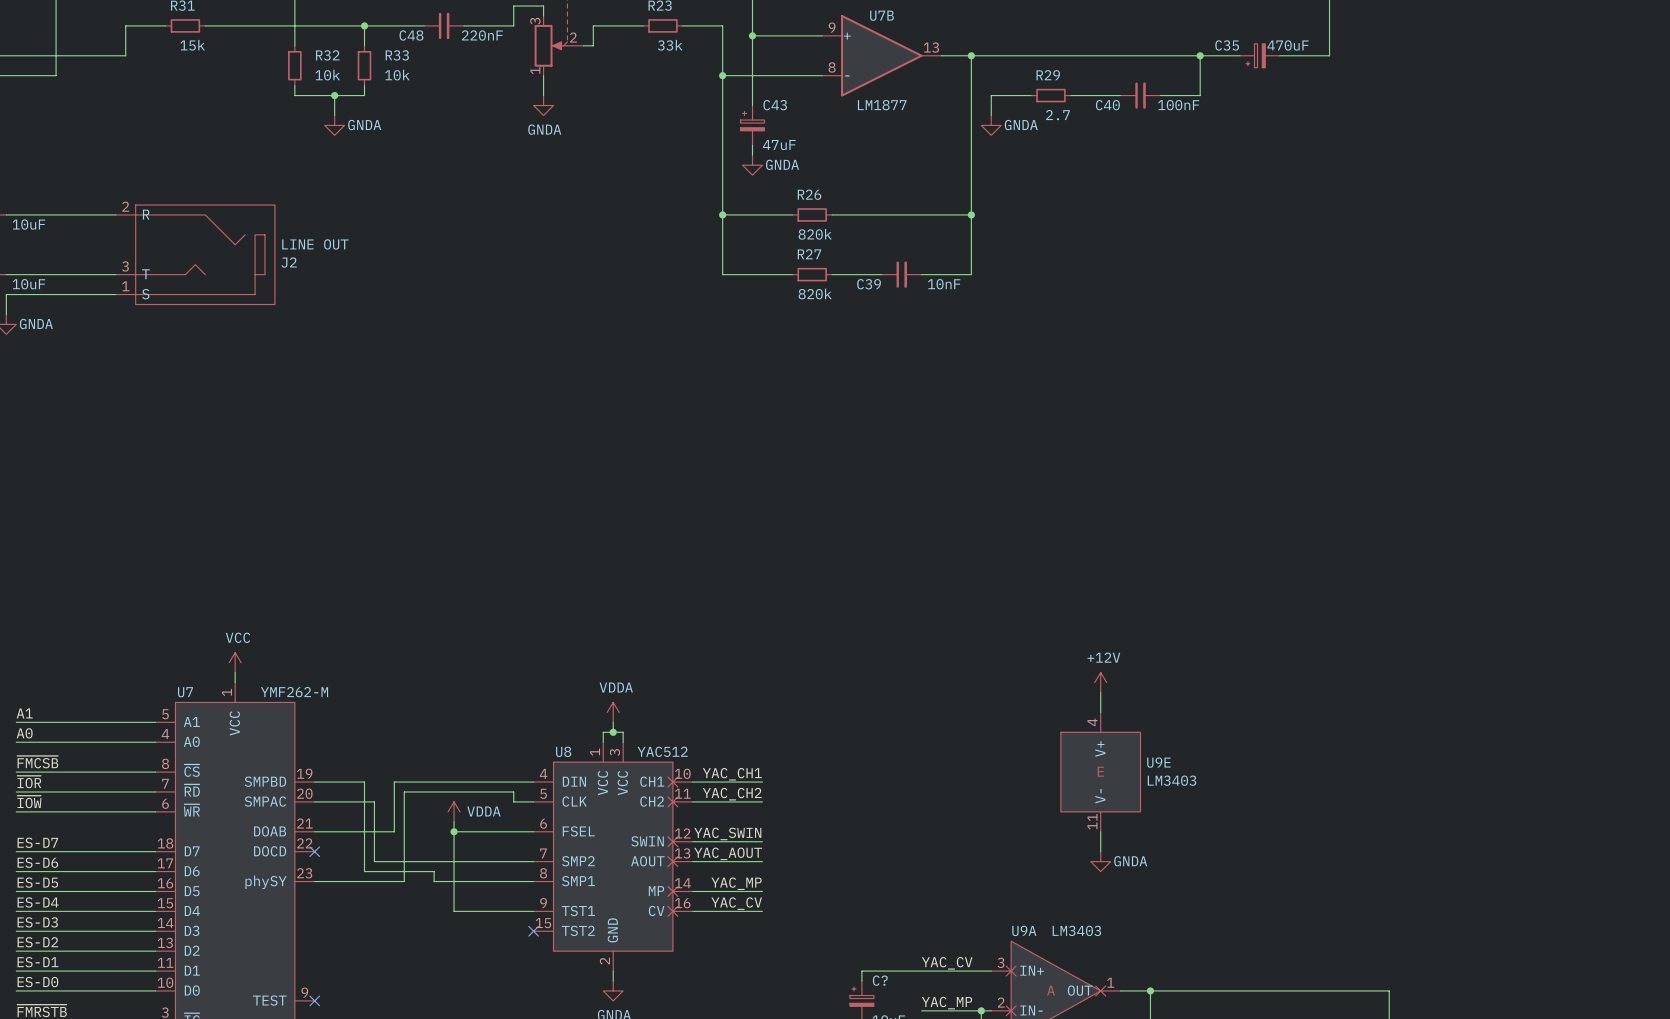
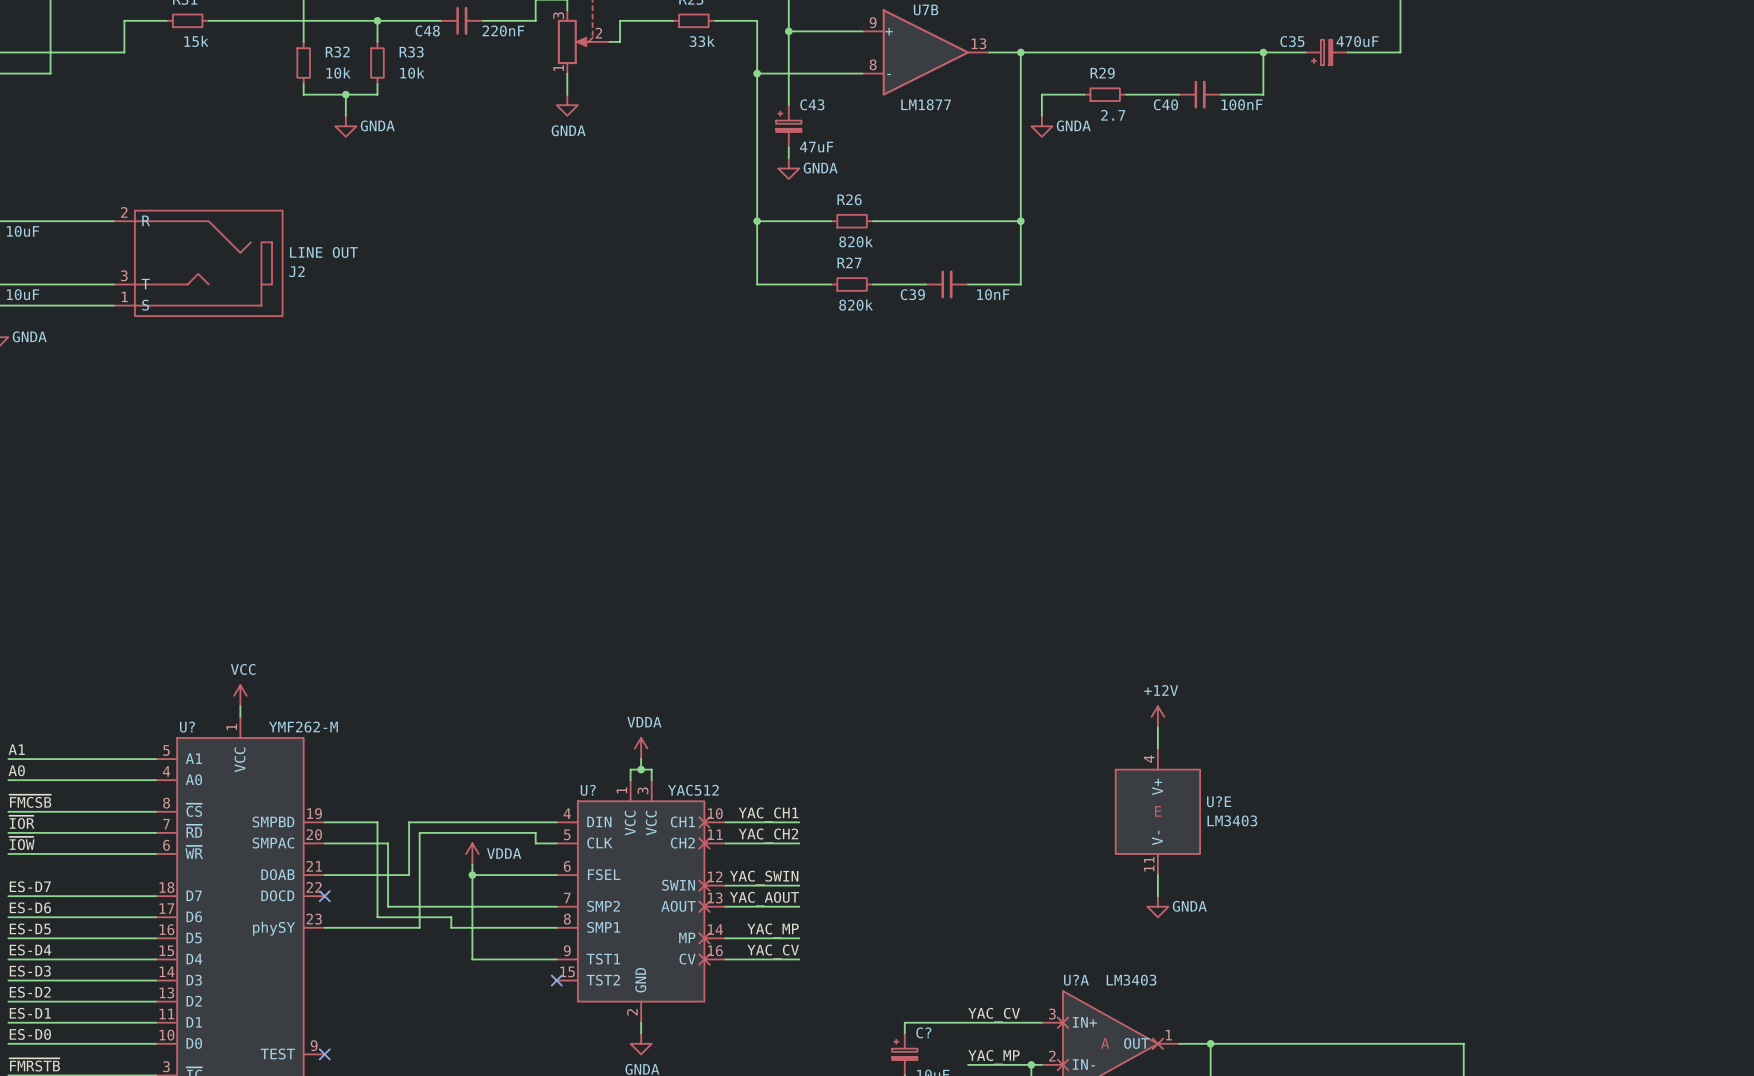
U7 name: U7 (185, 692) -> U? (187, 727)
U8 name: U8 (563, 751) -> U? (588, 790)
U9E name: U9E (1158, 762) -> U?E (1219, 801)
U9A name: U9A (1024, 930) -> U?A (1076, 980)

